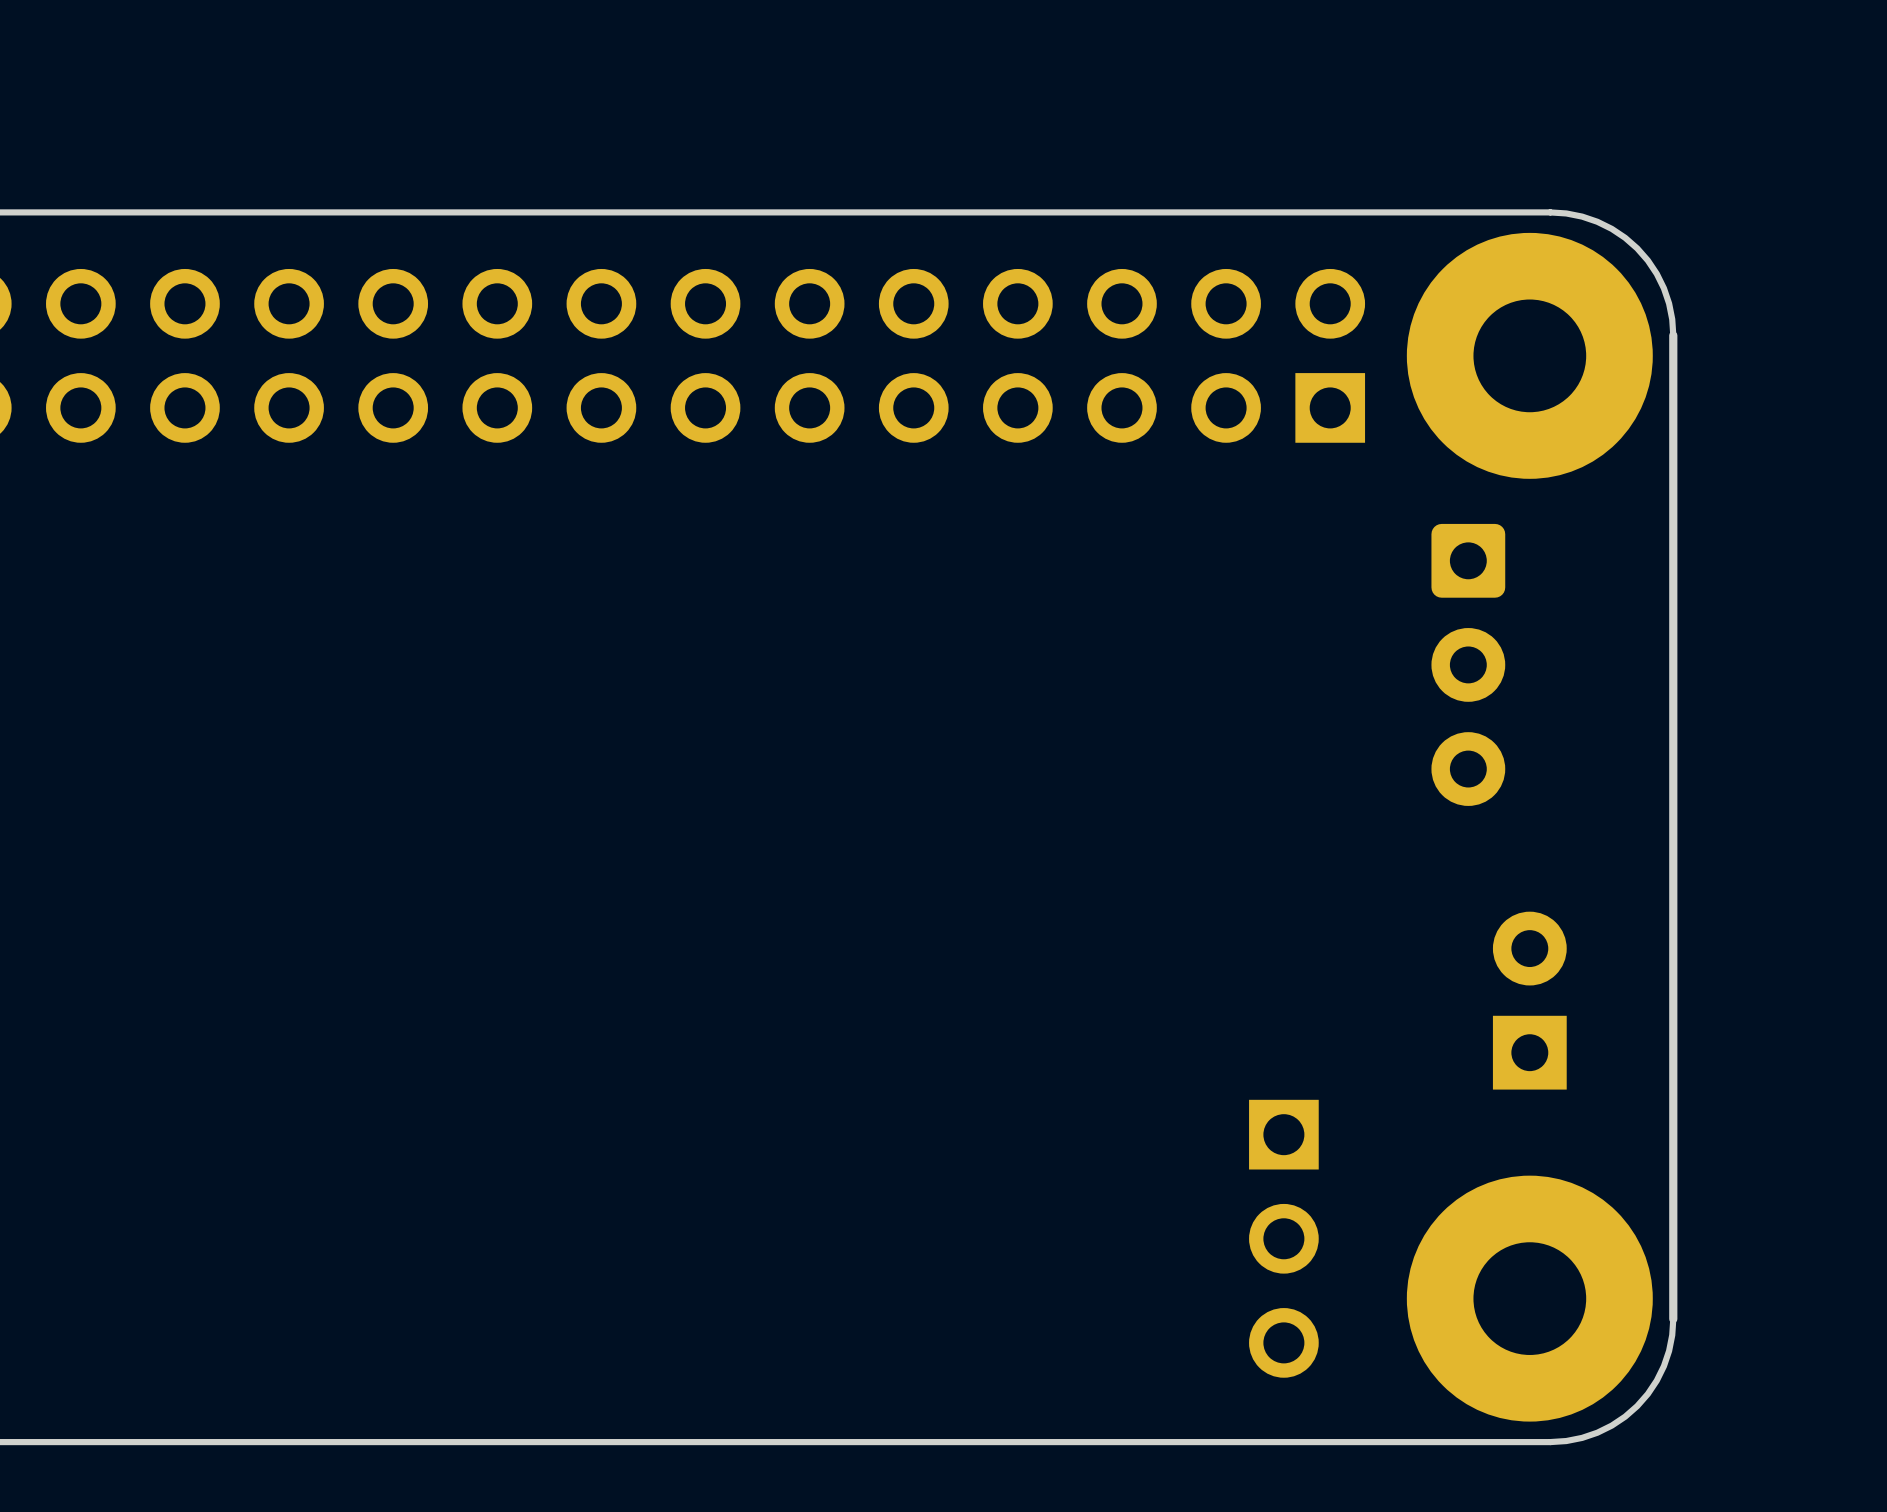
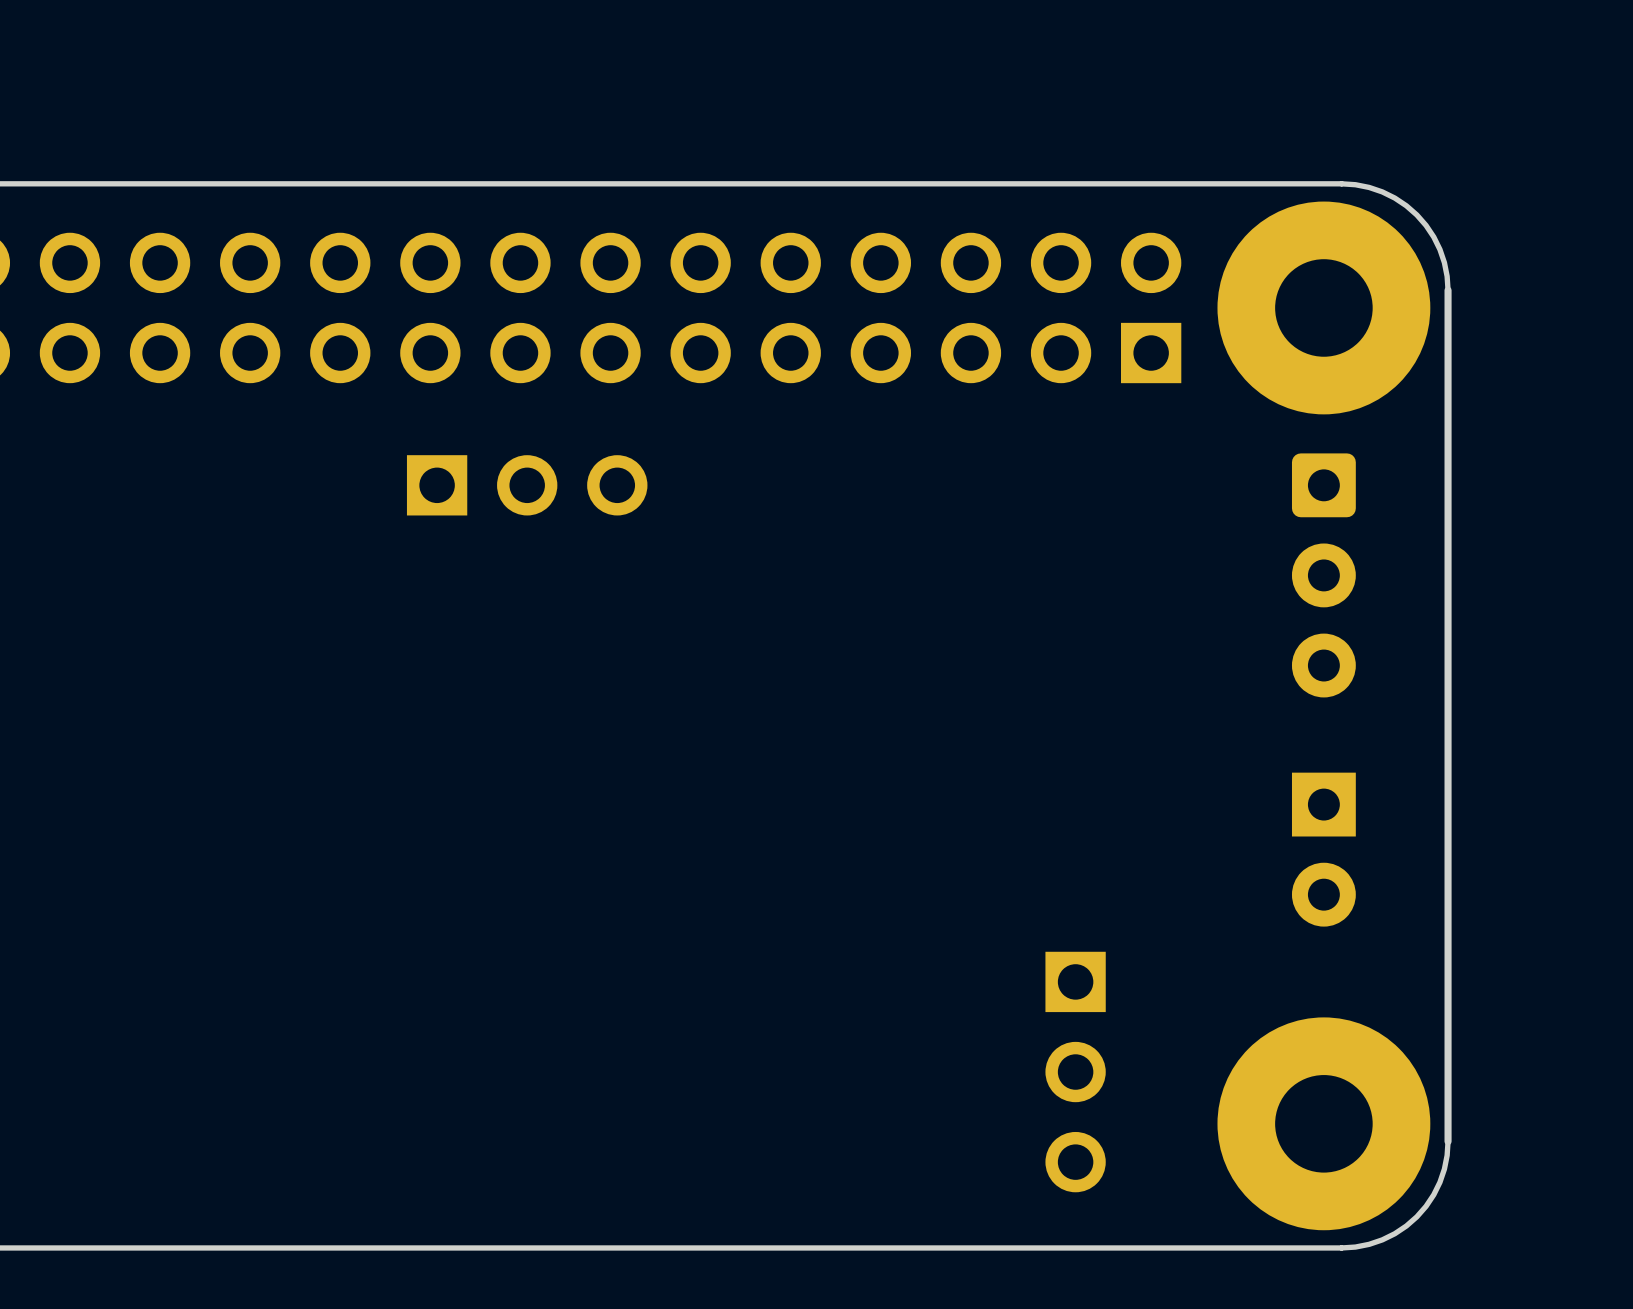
part: none -> (527, 485)
part position: (1468, 664) -> (1323, 575)
part rotation: 0° (1529, 1000) -> 180° (1323, 849)
part position: (1283, 1238) -> (1075, 1072)

